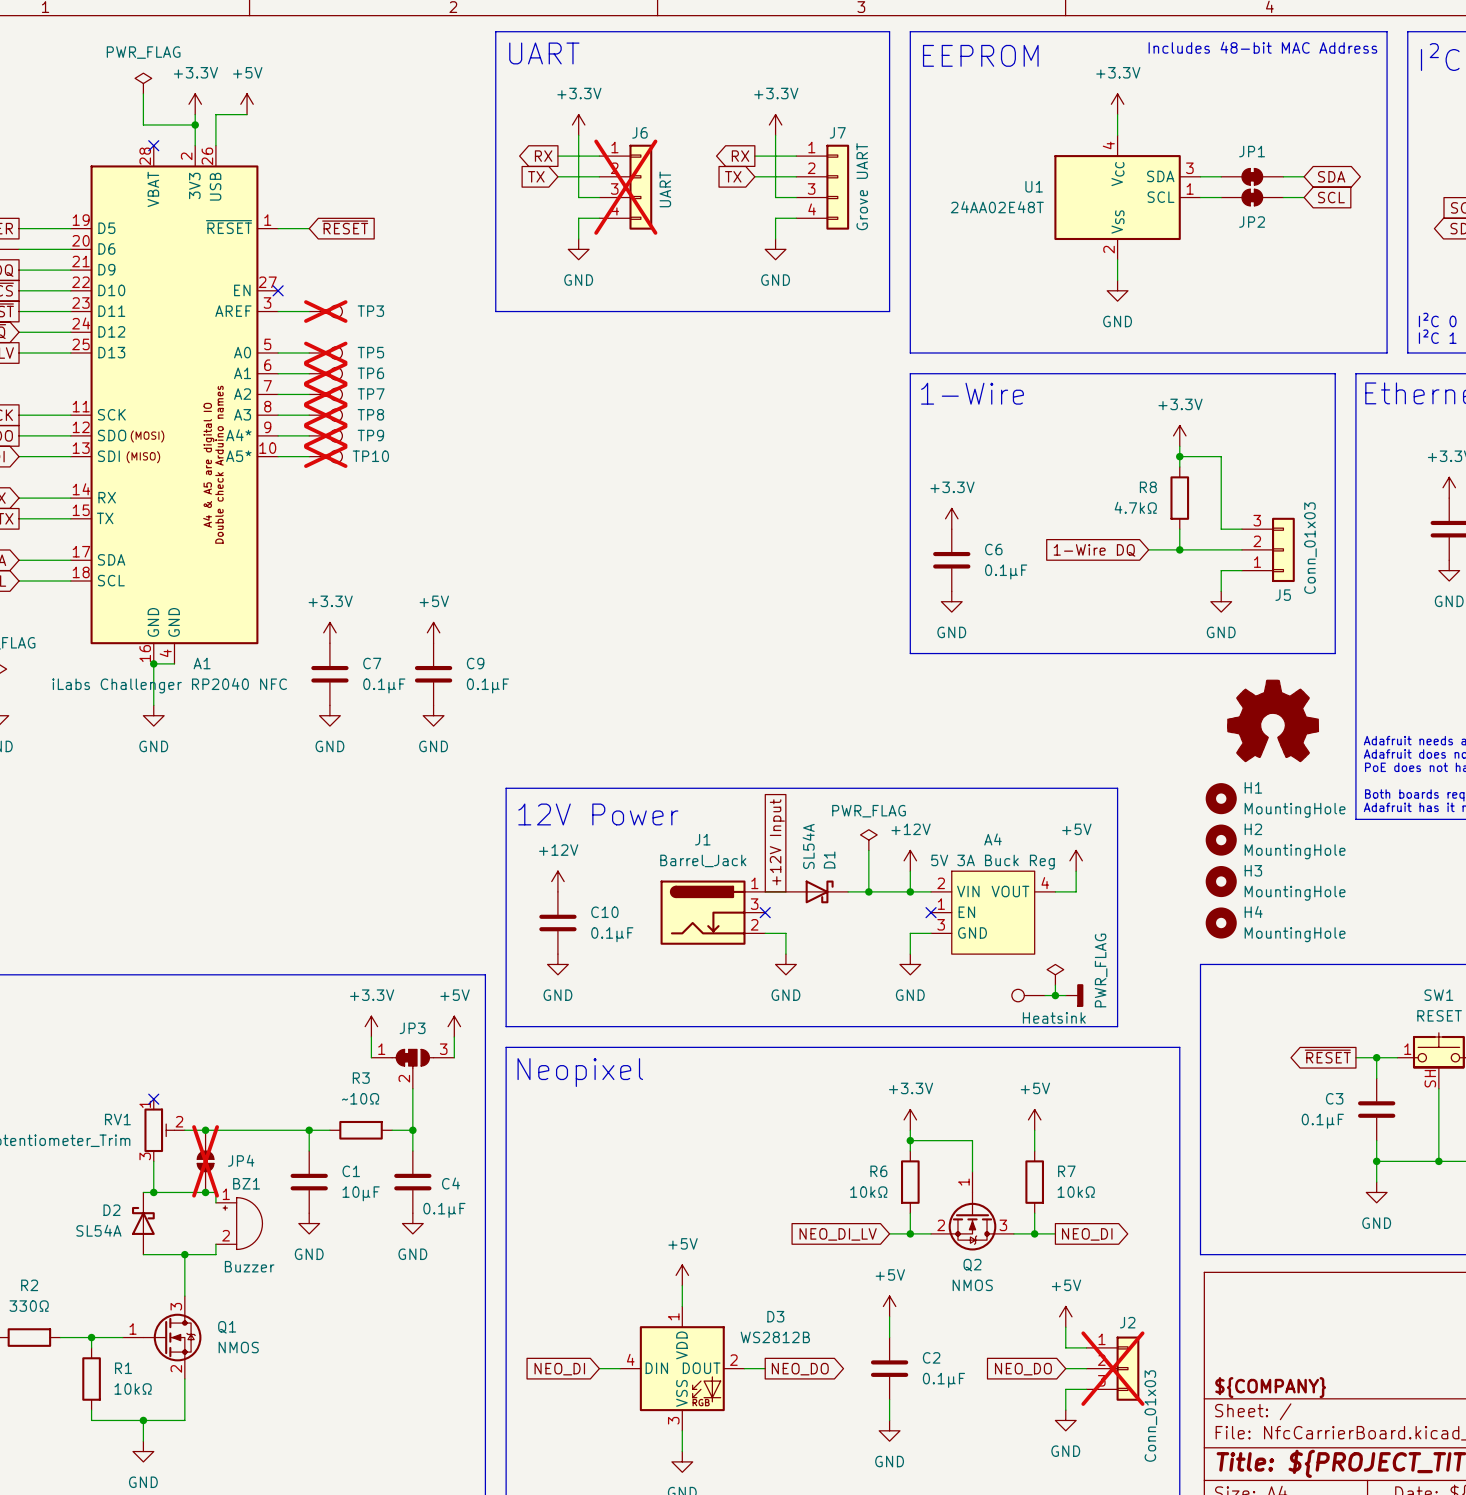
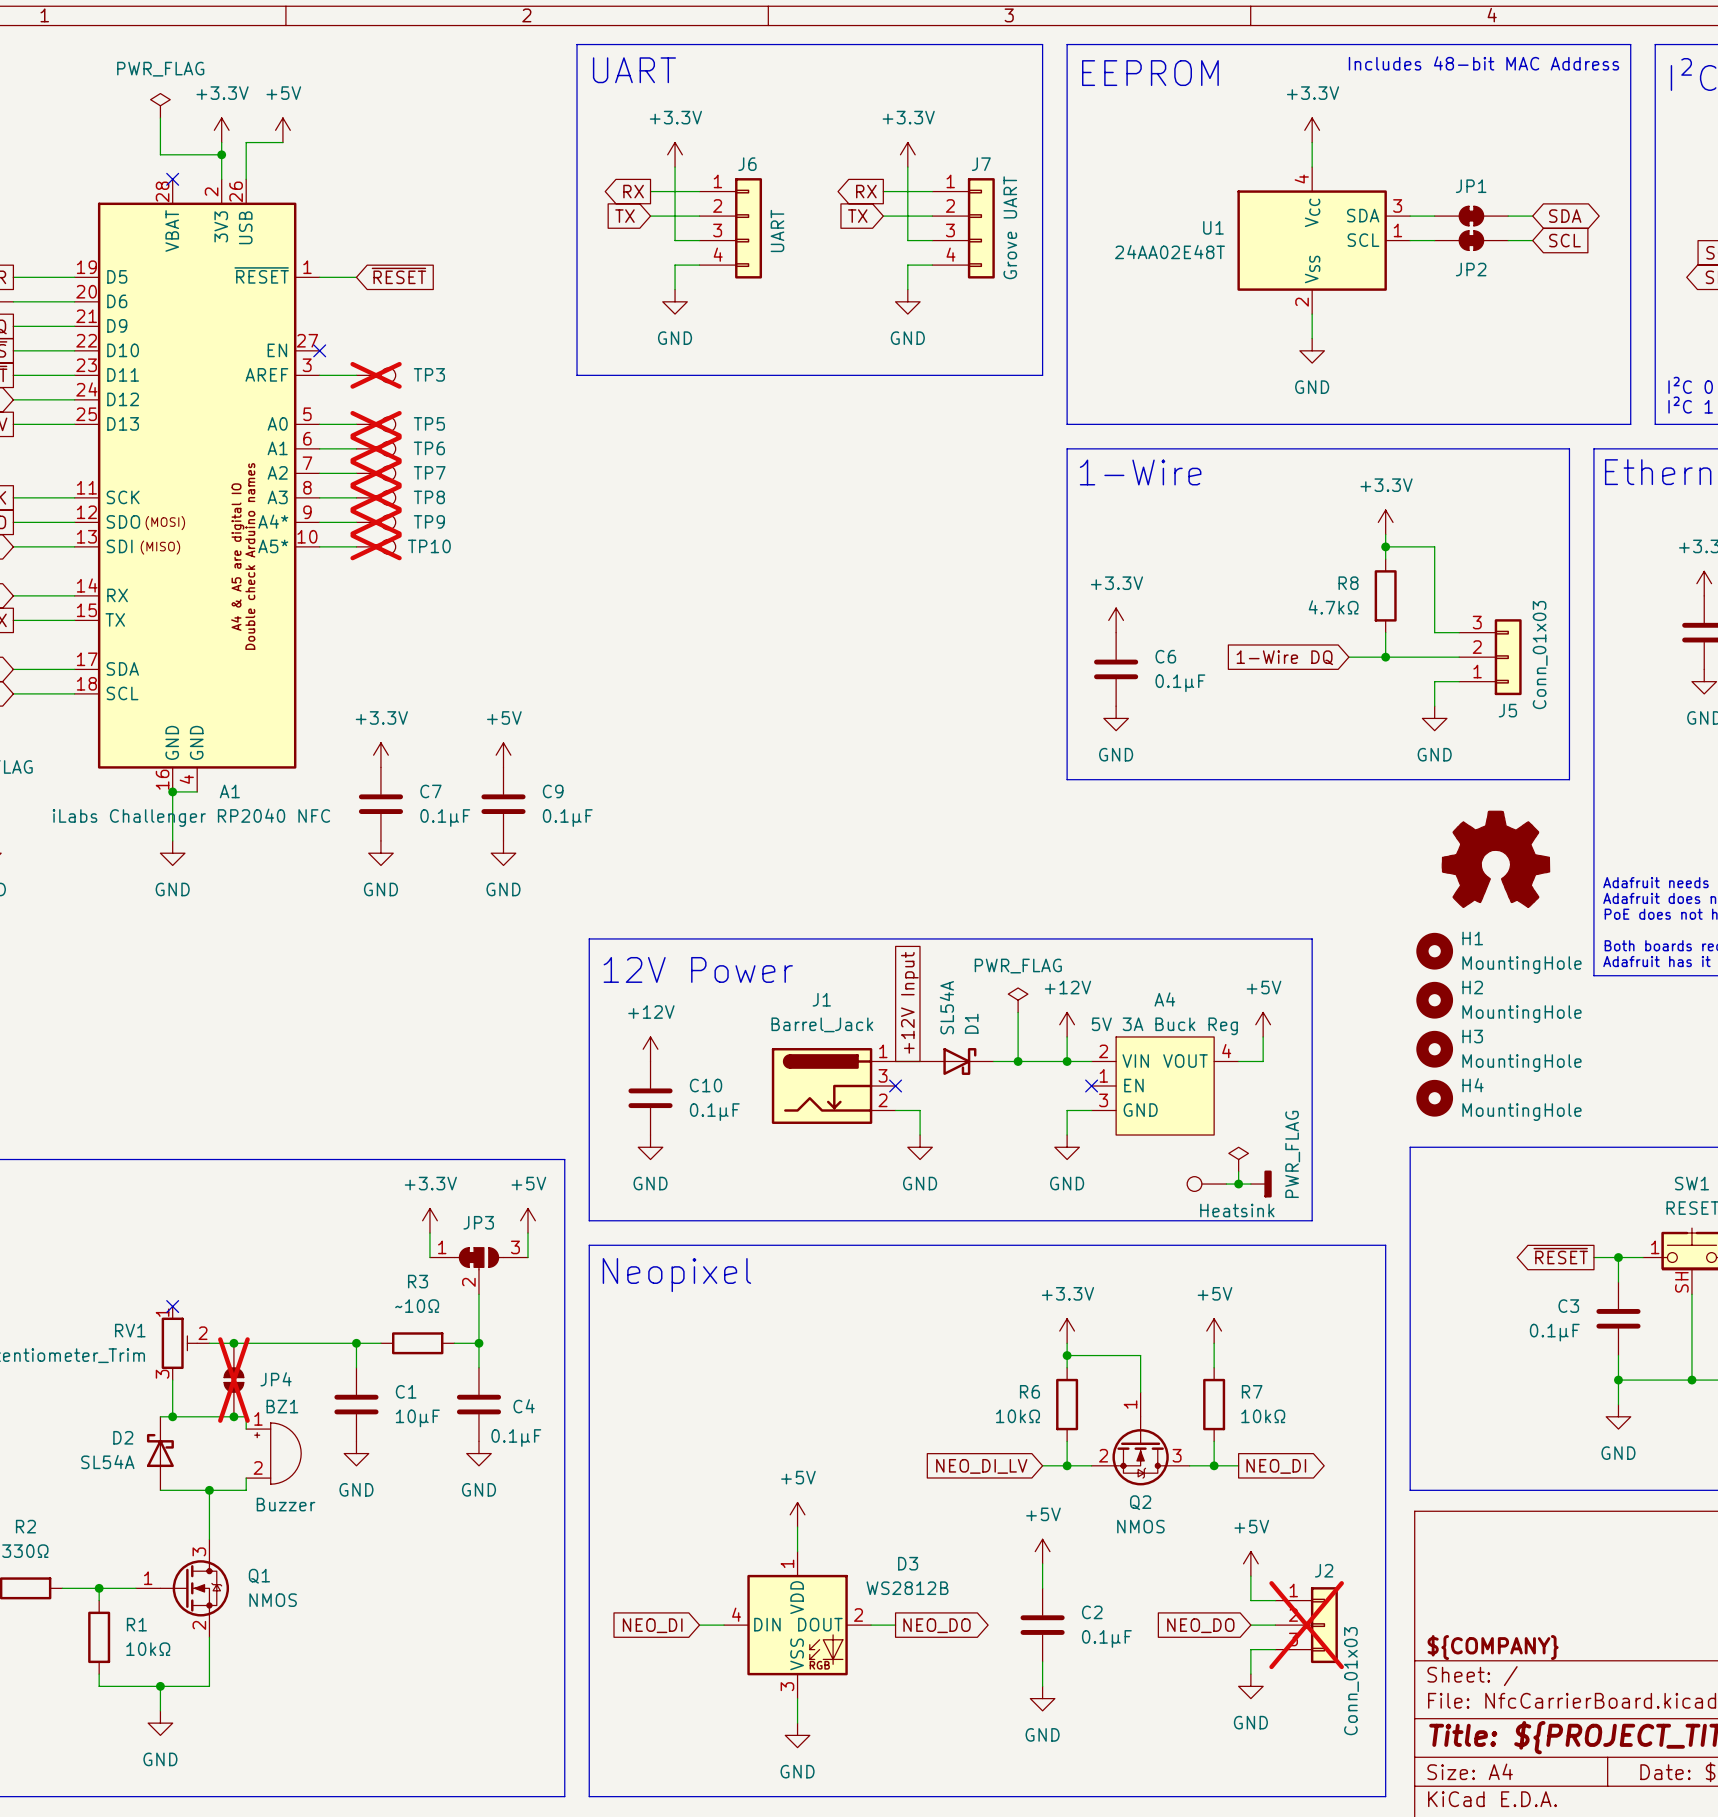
J6 do-not-place cross: (625, 187) -> none

